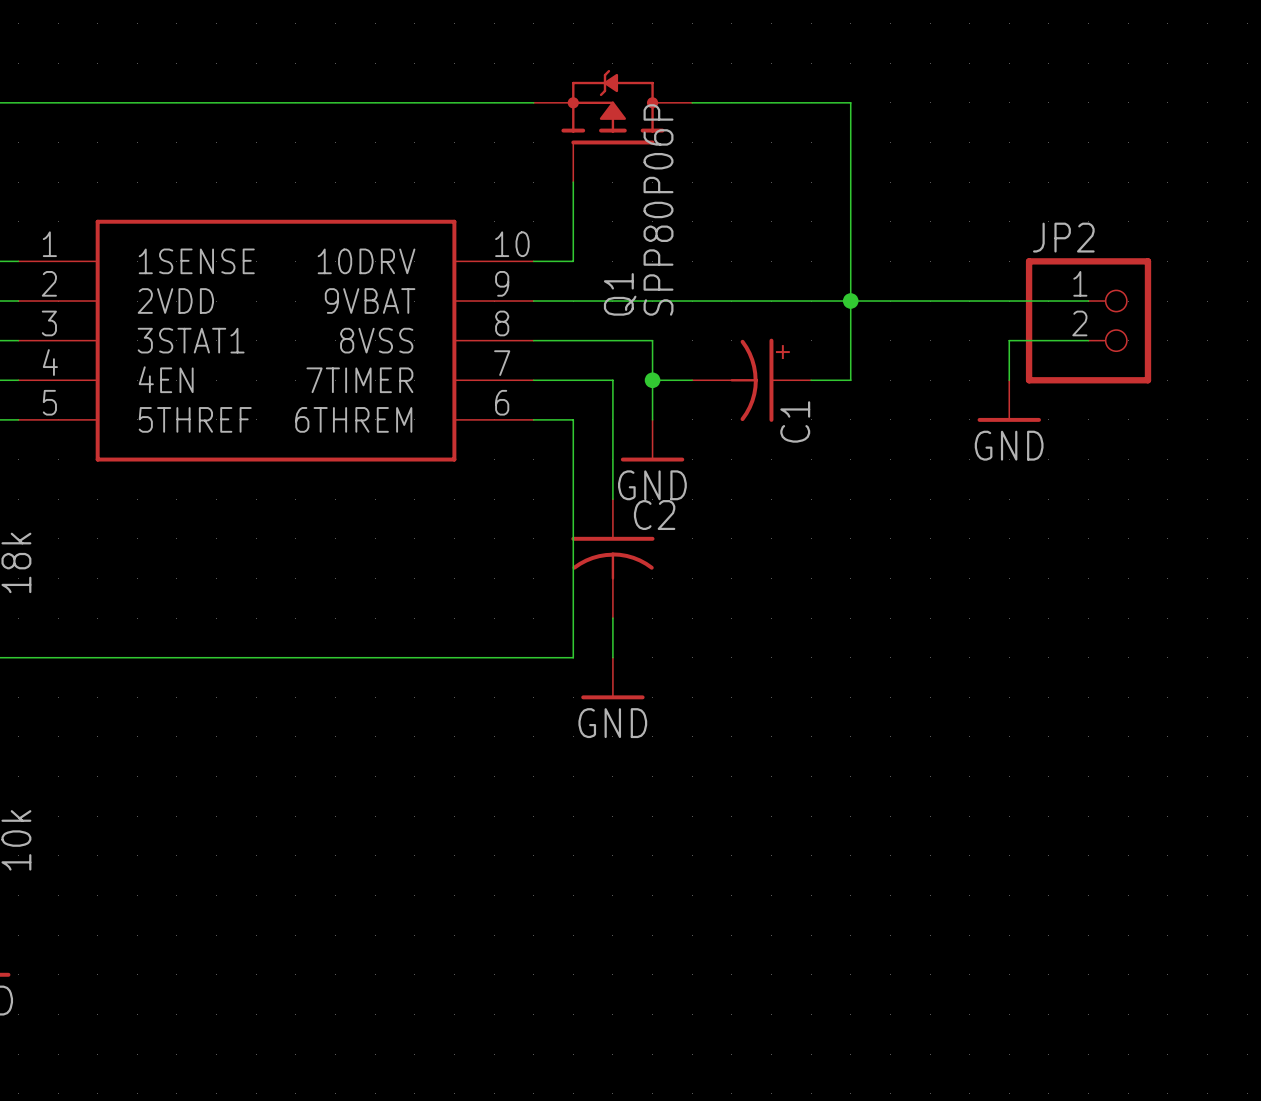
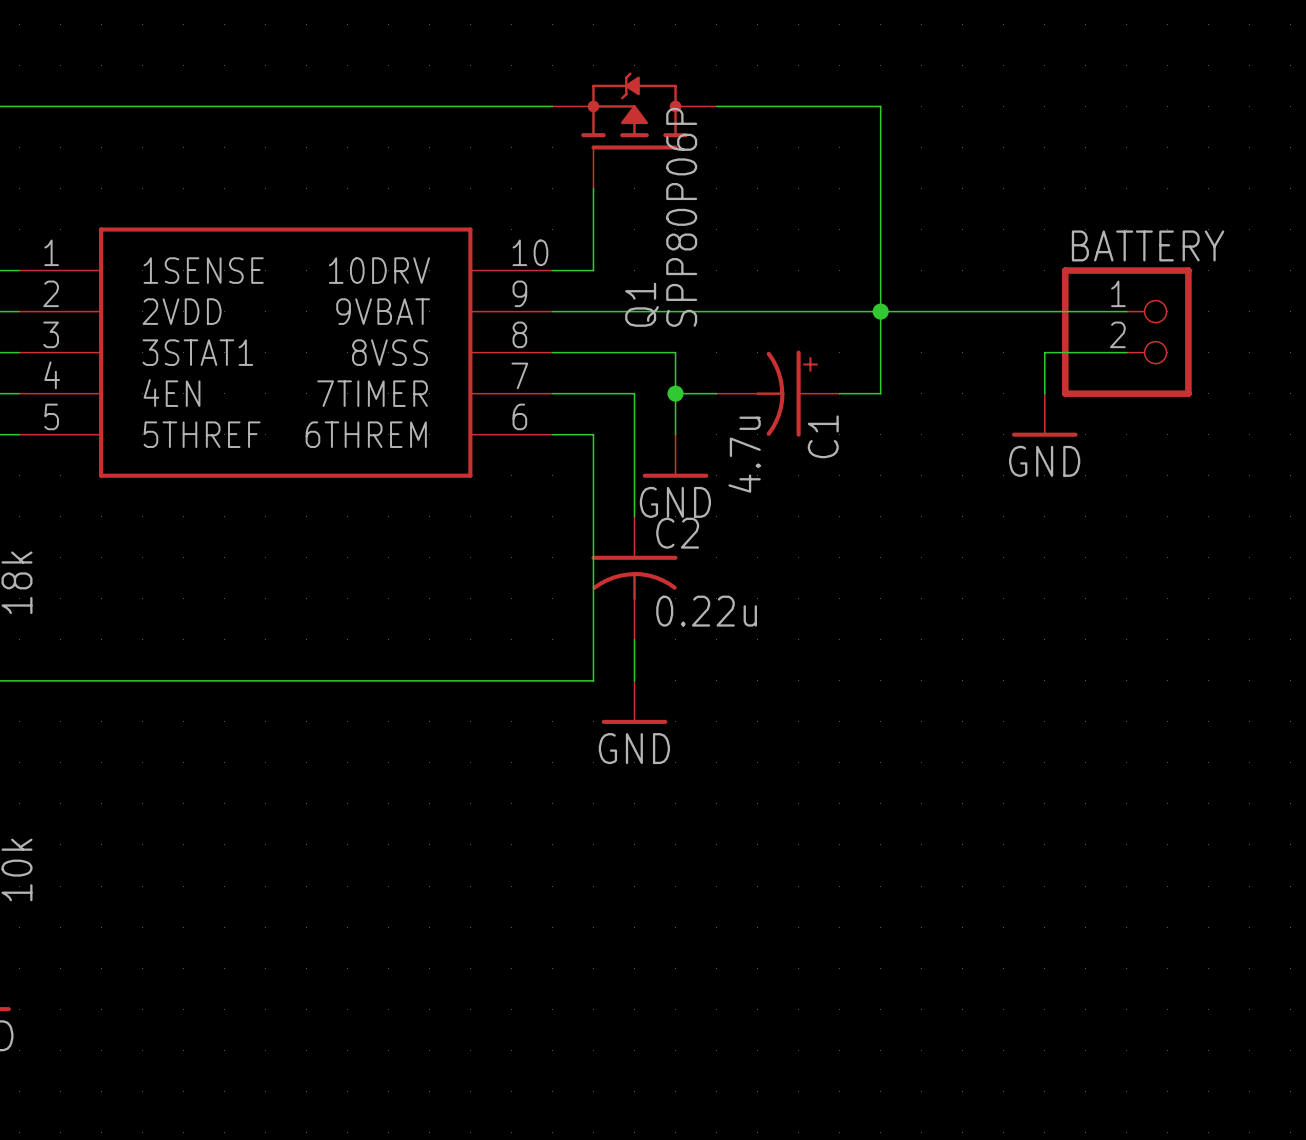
JP2 name: JP2 (1063, 237) -> BATTERY (1148, 245)
C1 value: none -> 4.7u (744, 454)
C2 value: none -> 0.22u (706, 611)

